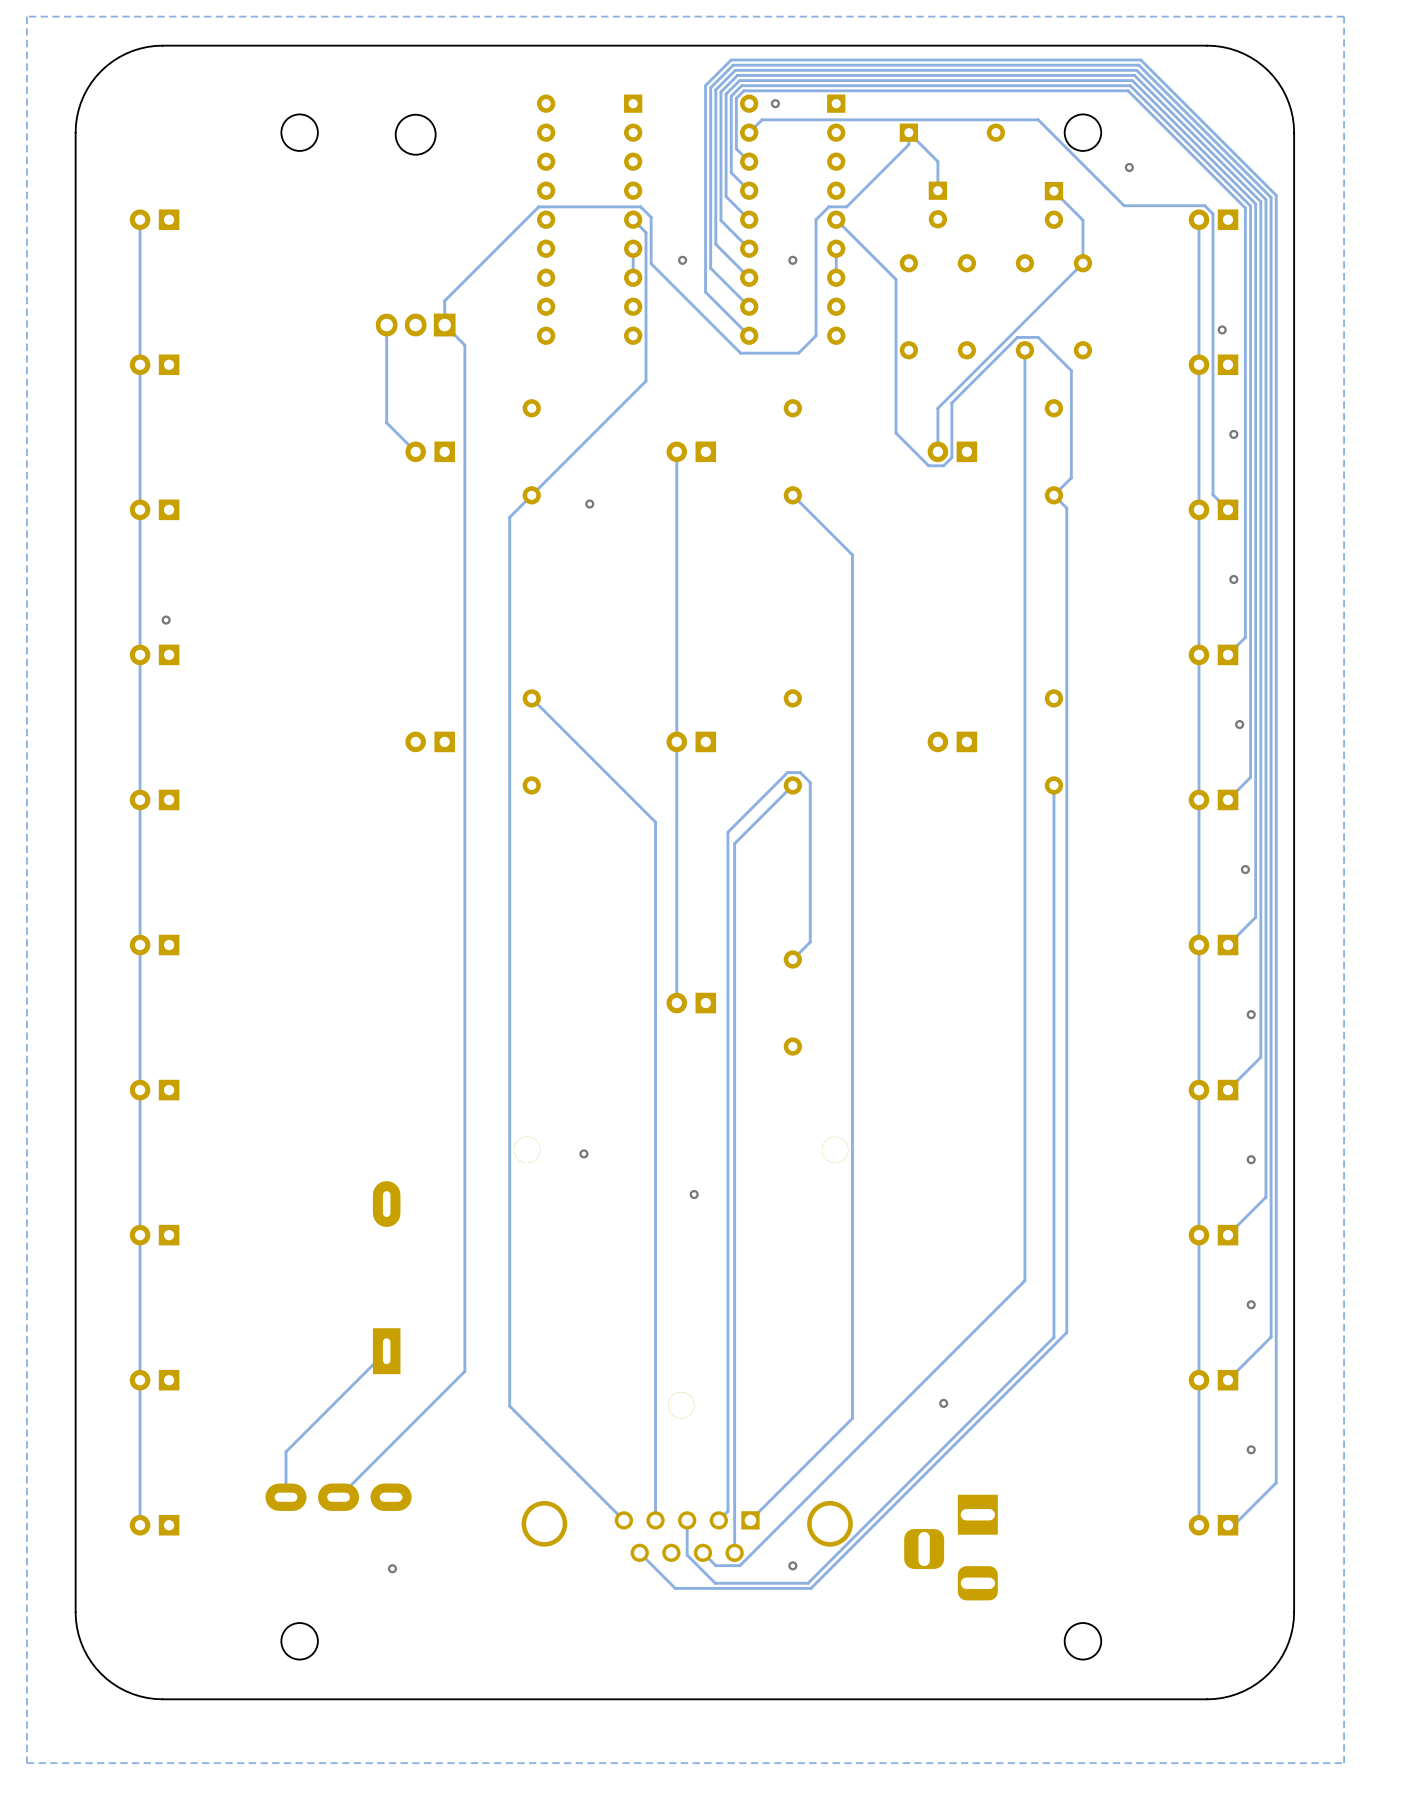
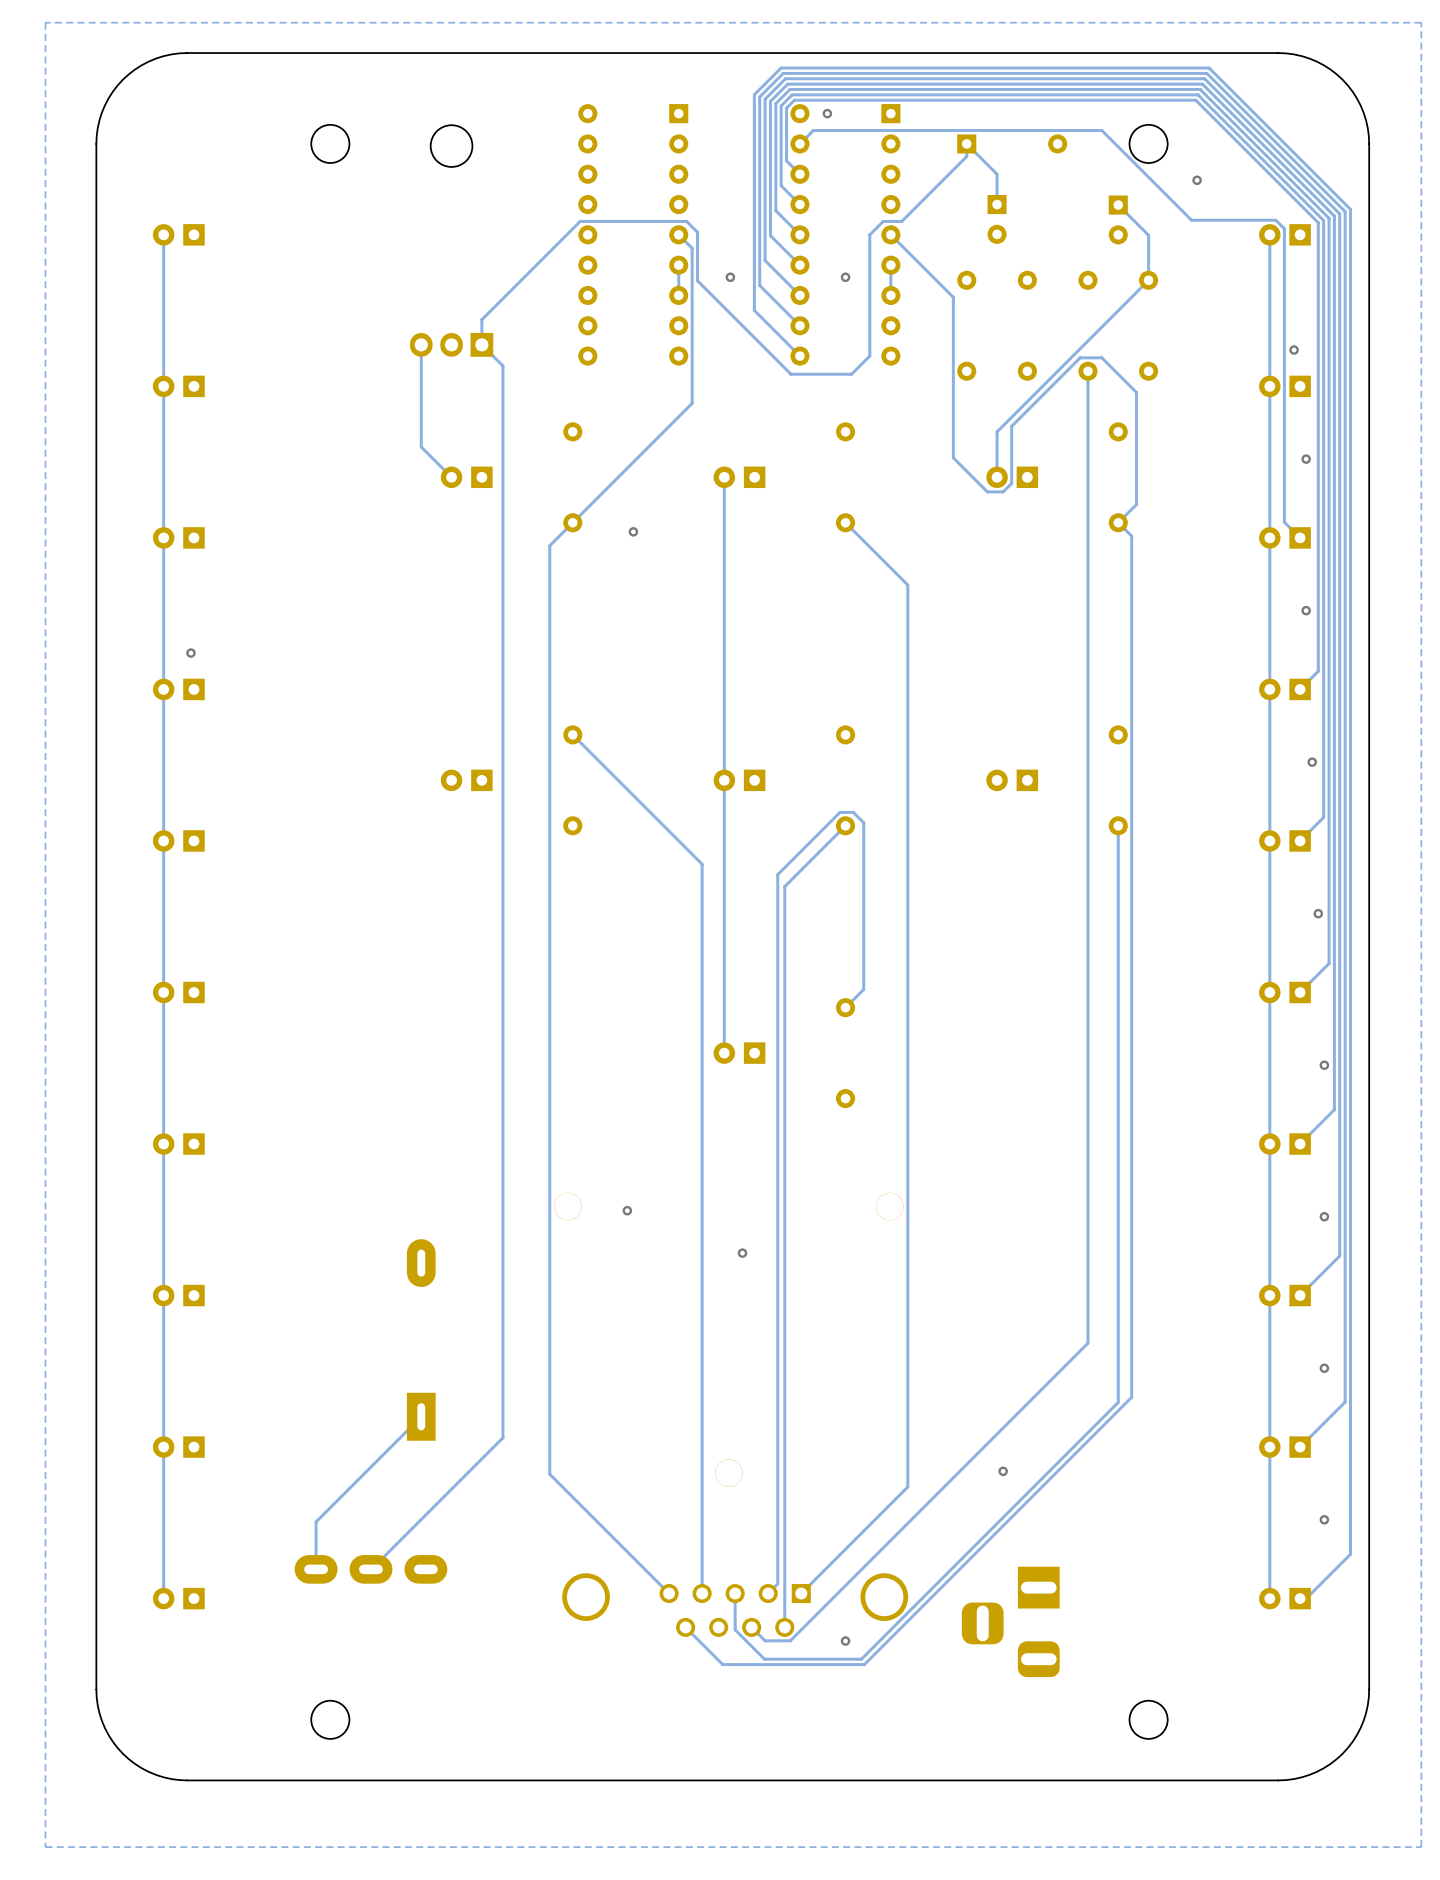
via: (392, 1568) -> none

